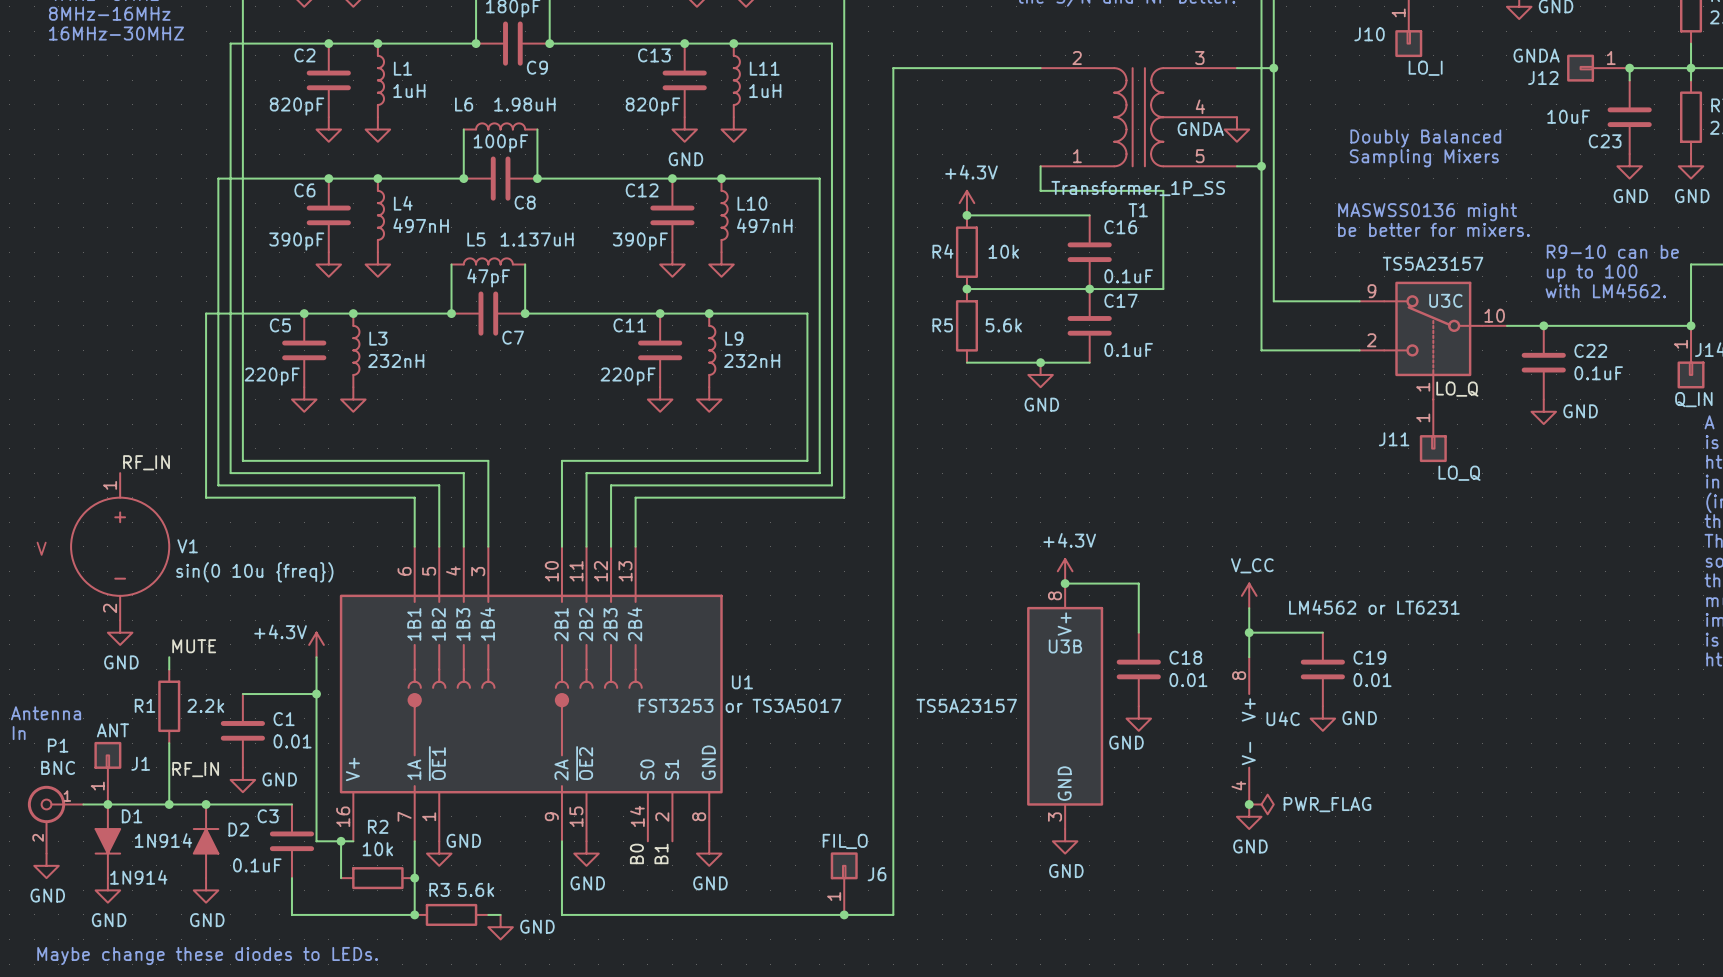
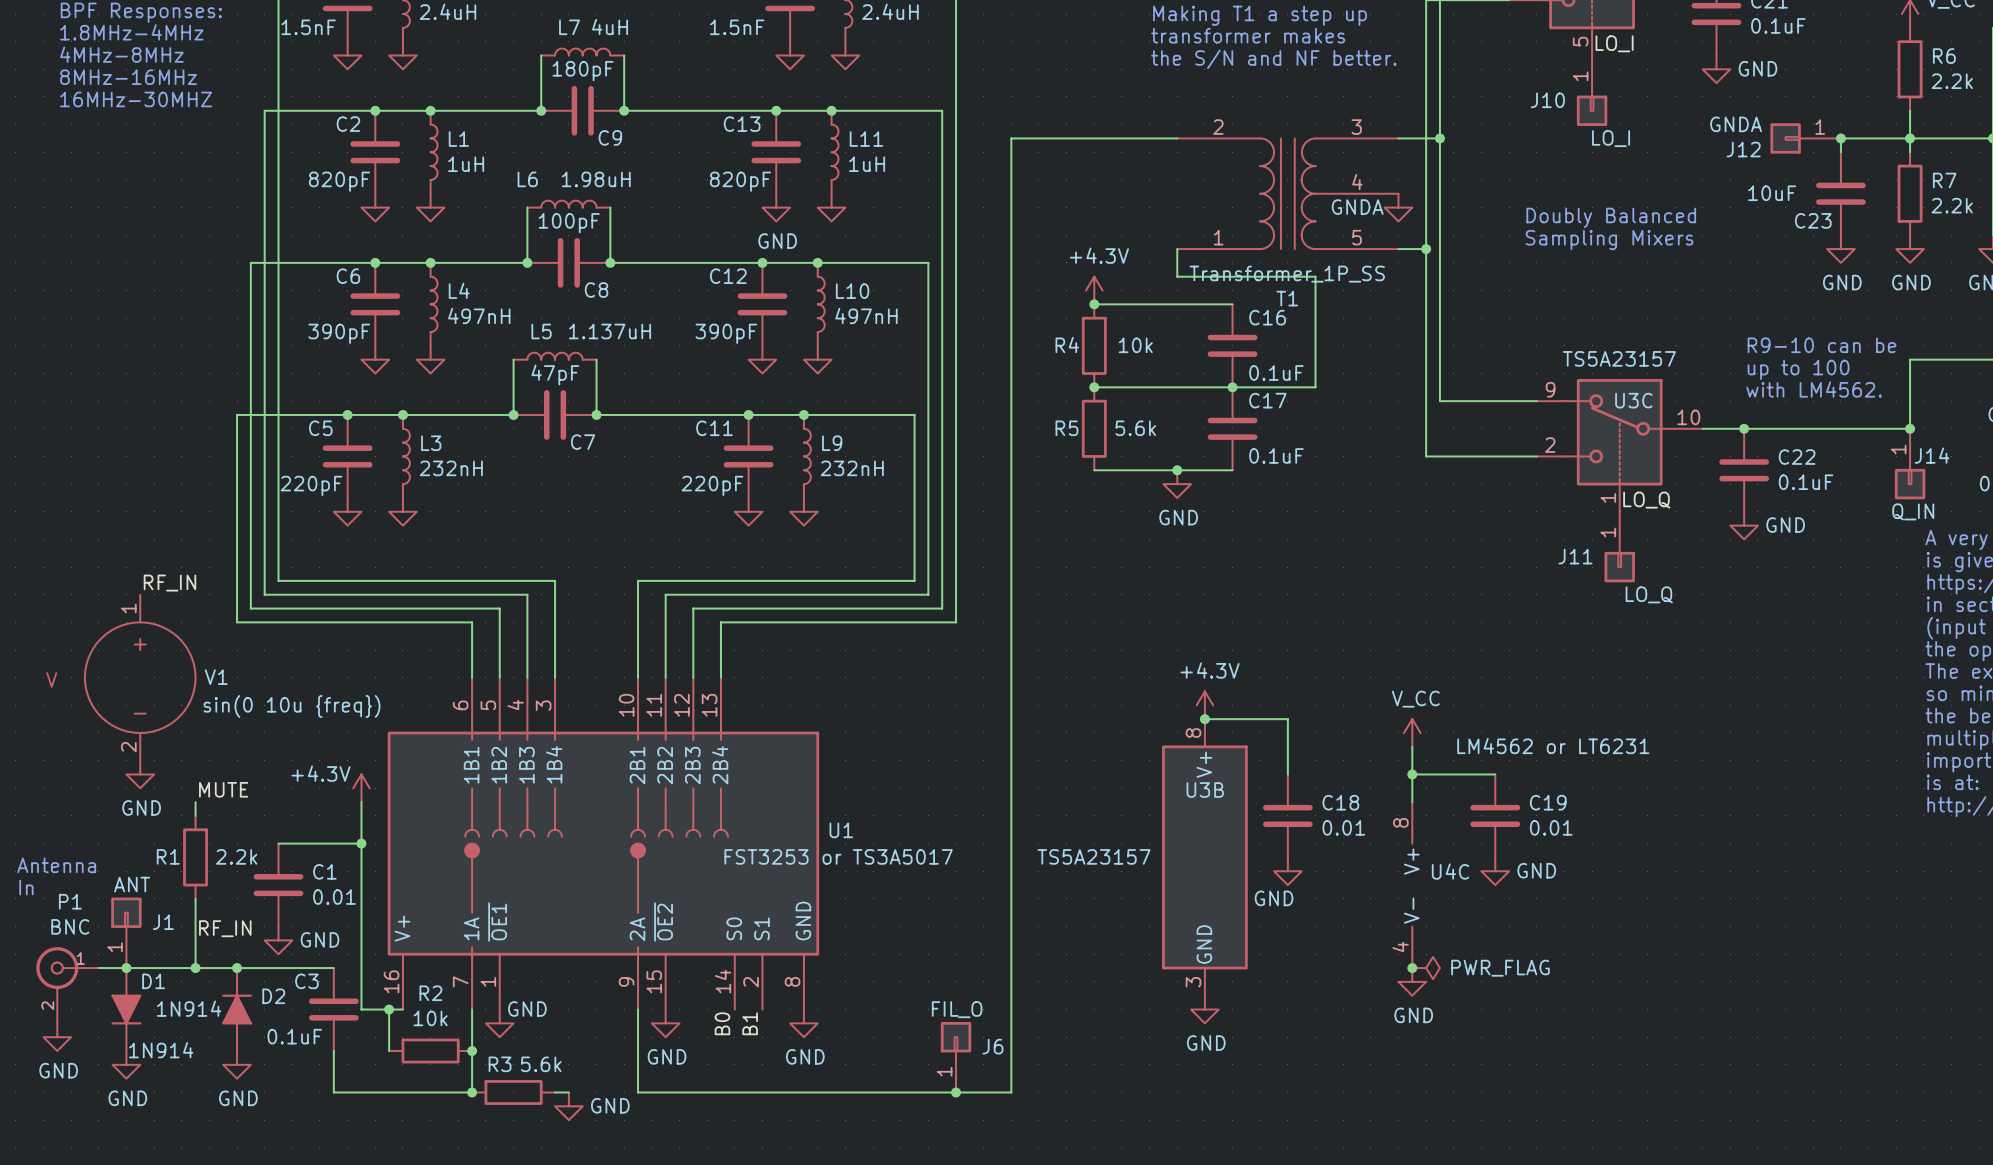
text: MASWSS0136 might (1427, 212) -> none
text: be better for mixers. (1433, 229) -> none
text: Maybe change these diodes to LEDs. (207, 956) -> none

